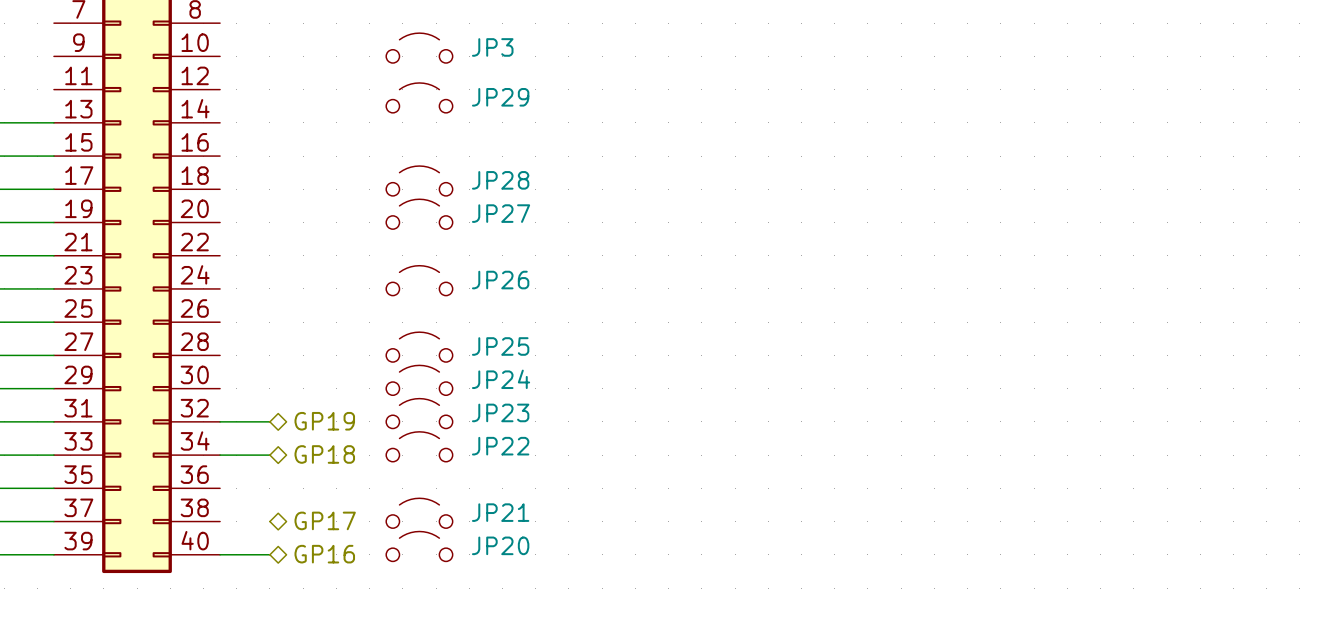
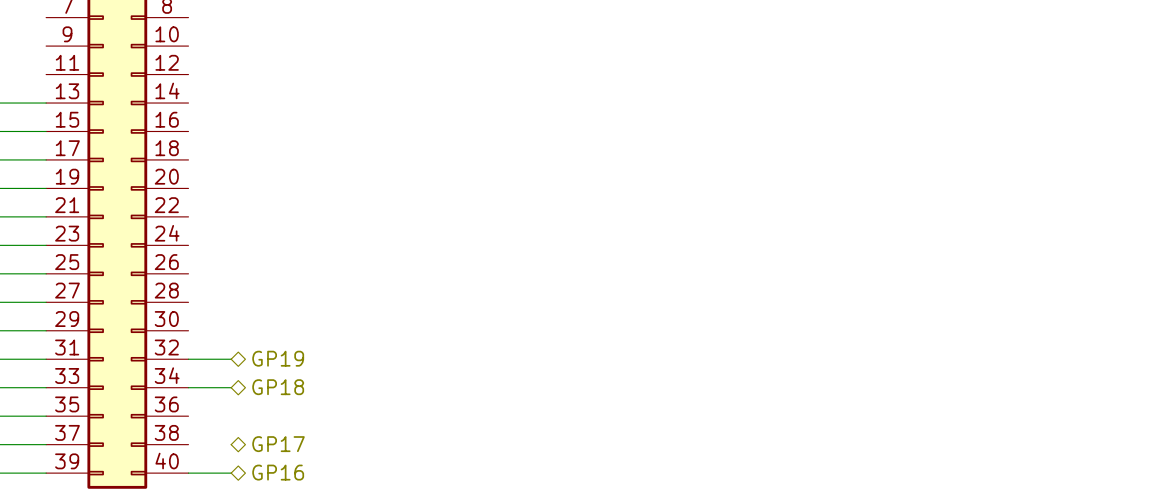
JP3: (419, 48) -> none
JP29: (419, 97) -> none
JP28: (419, 180) -> none
JP27: (419, 214) -> none
JP26: (419, 280) -> none
JP25: (419, 347) -> none
JP24: (419, 380) -> none
JP23: (419, 413) -> none
JP22: (419, 446) -> none
JP21: (419, 513) -> none
JP20: (419, 546) -> none

